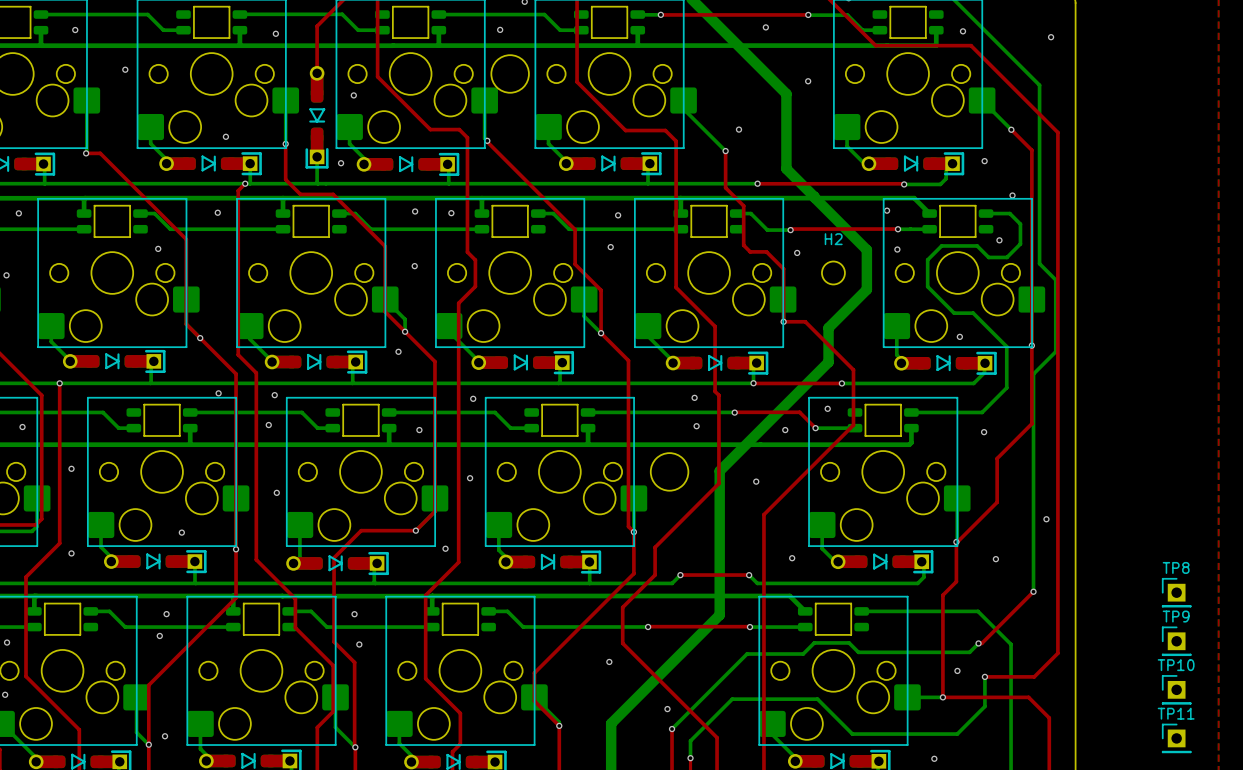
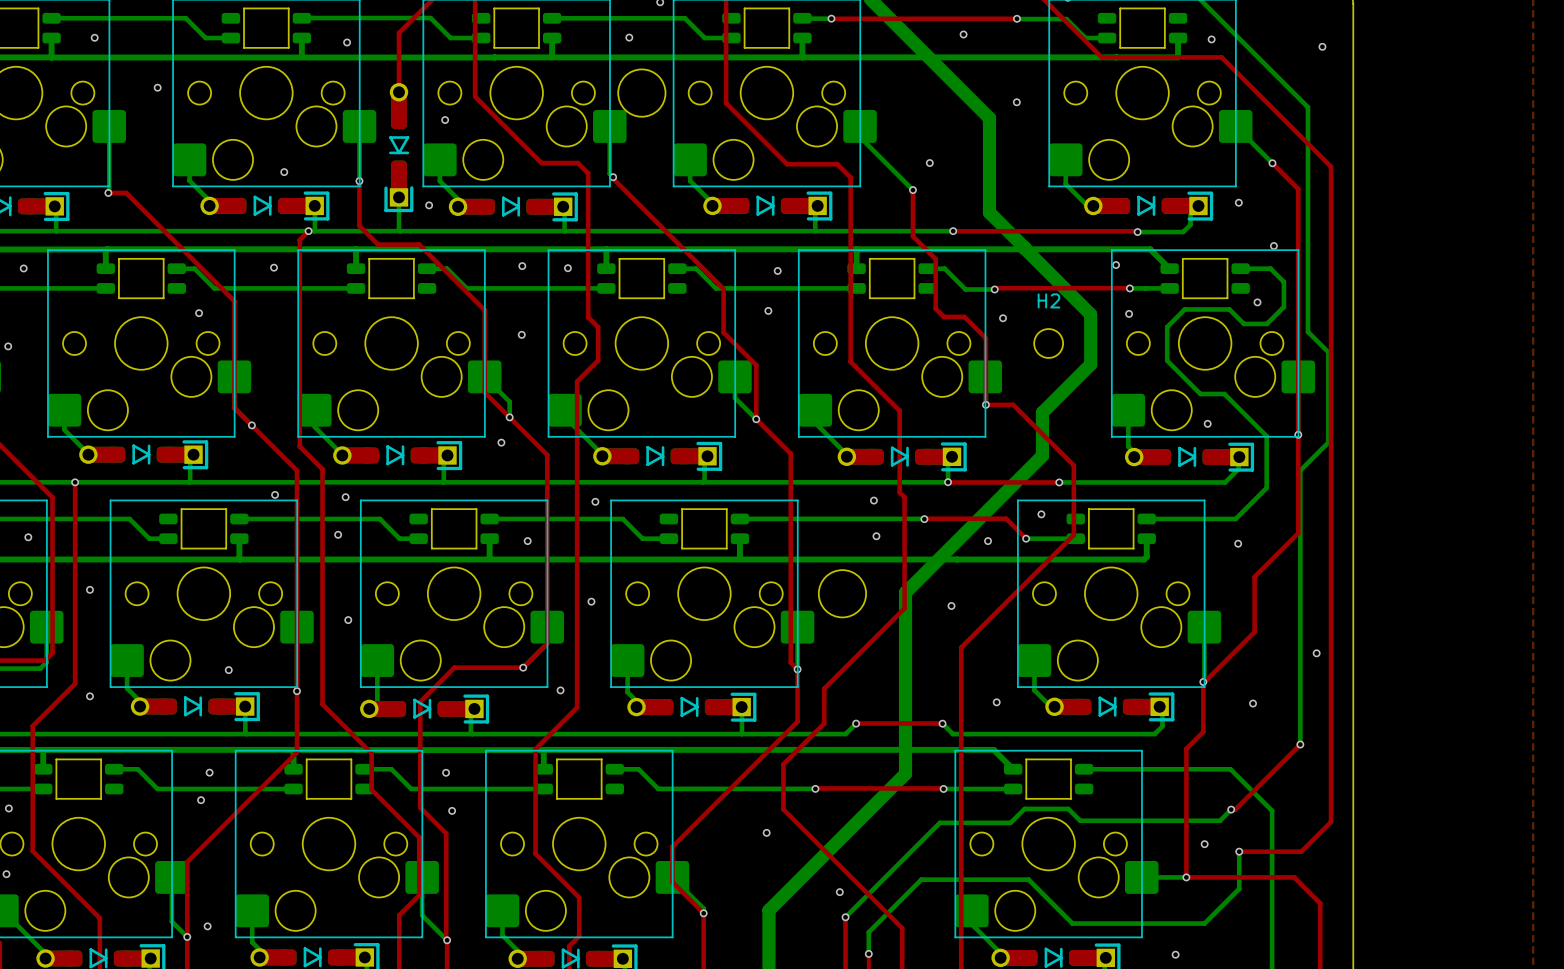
TP8: (1176, 592) -> none
TP9: (1176, 641) -> none
TP10: (1176, 689) -> none
TP11: (1176, 738) -> none

